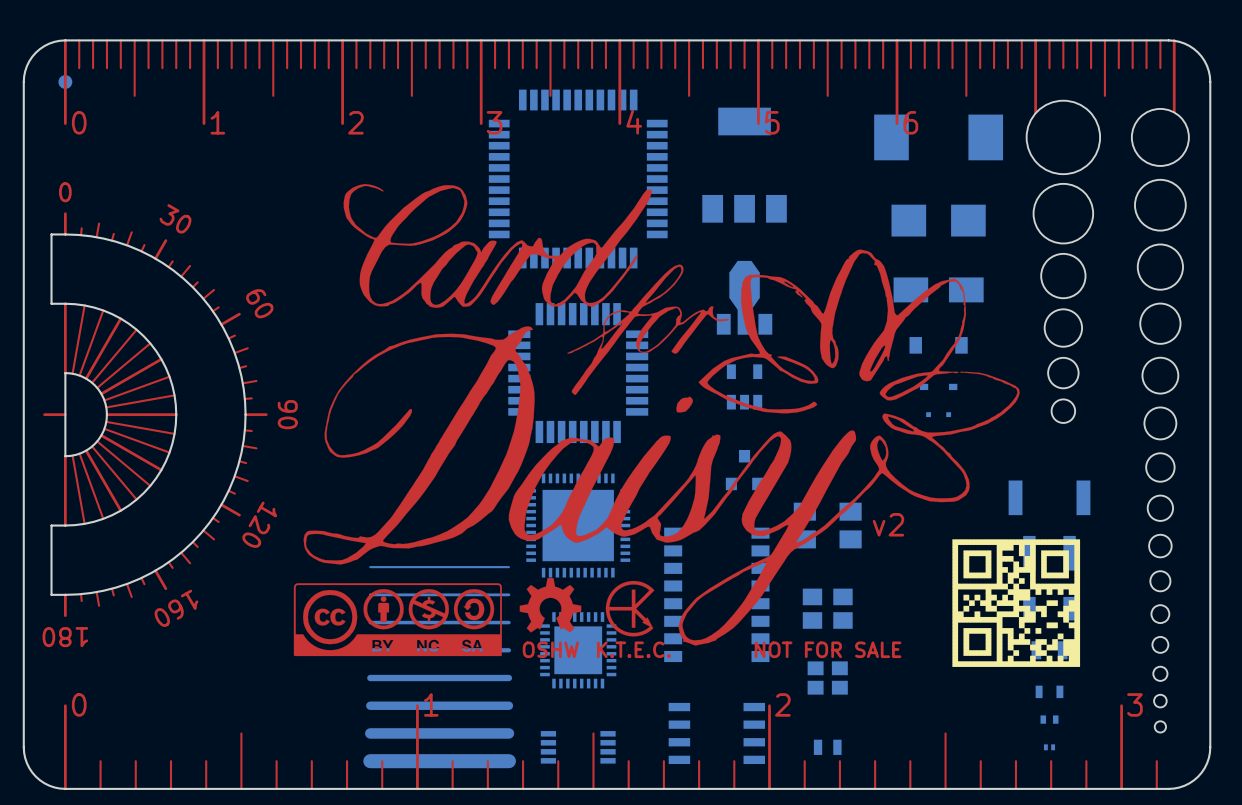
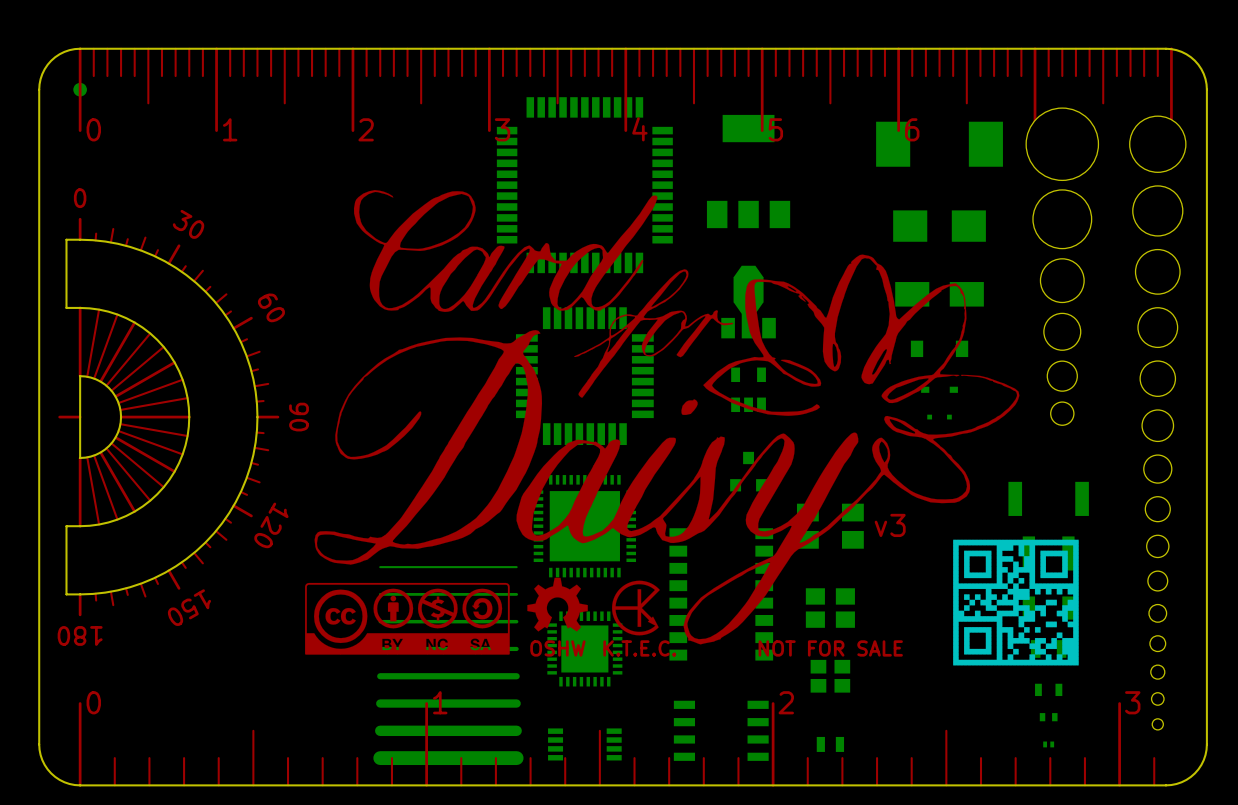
text: v2 (888, 524) -> v3 (890, 525)
text: 160 (176, 608) -> 150 (189, 607)

